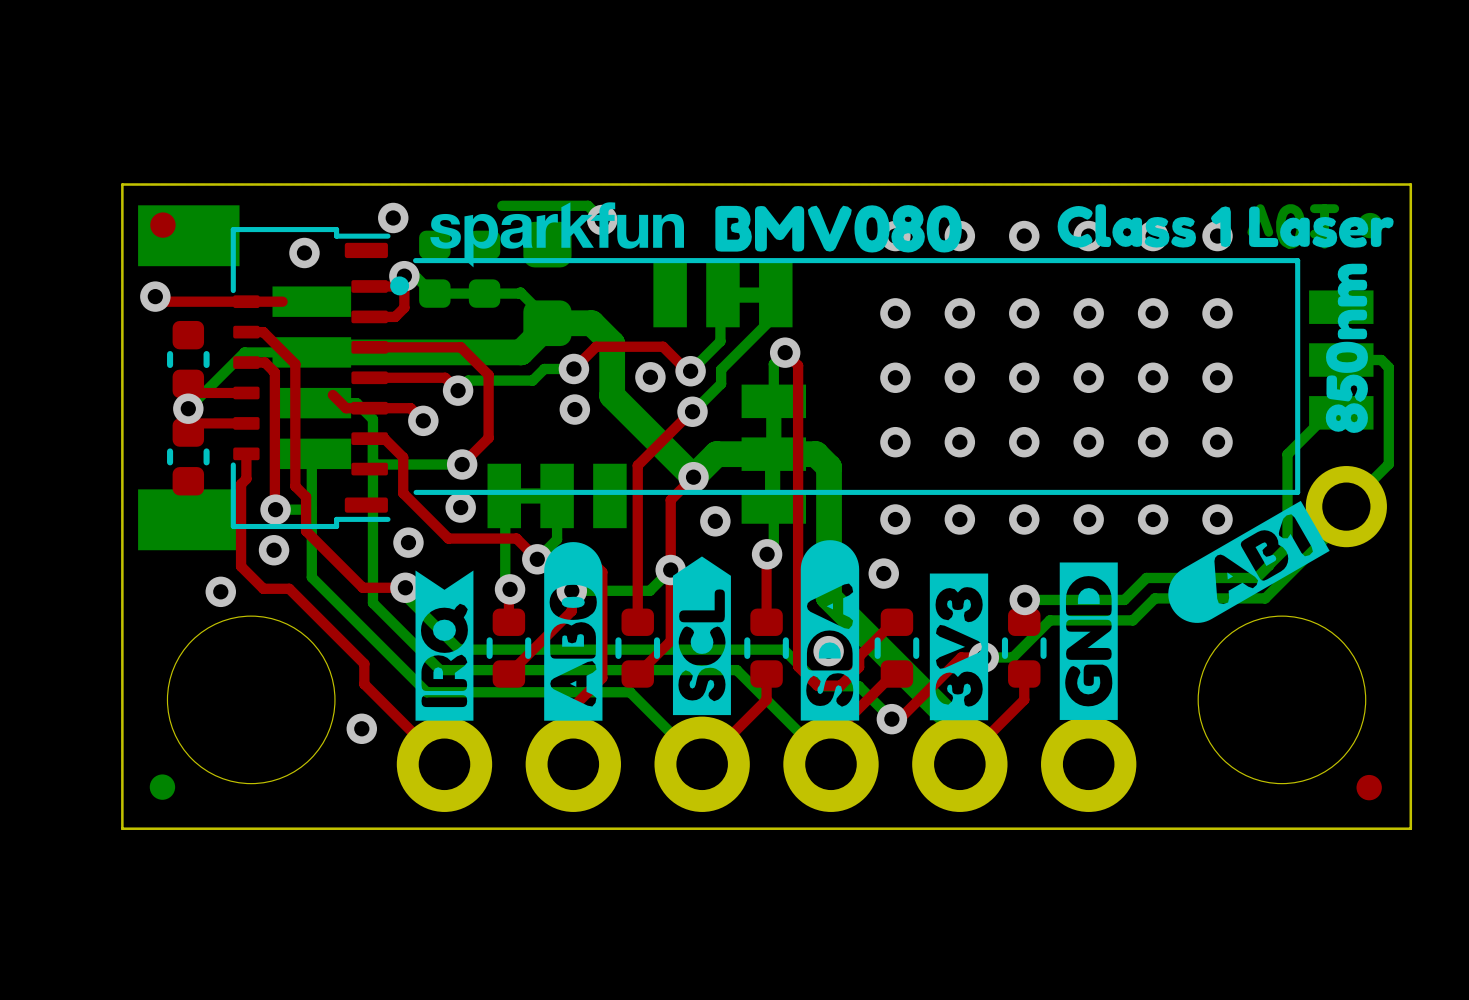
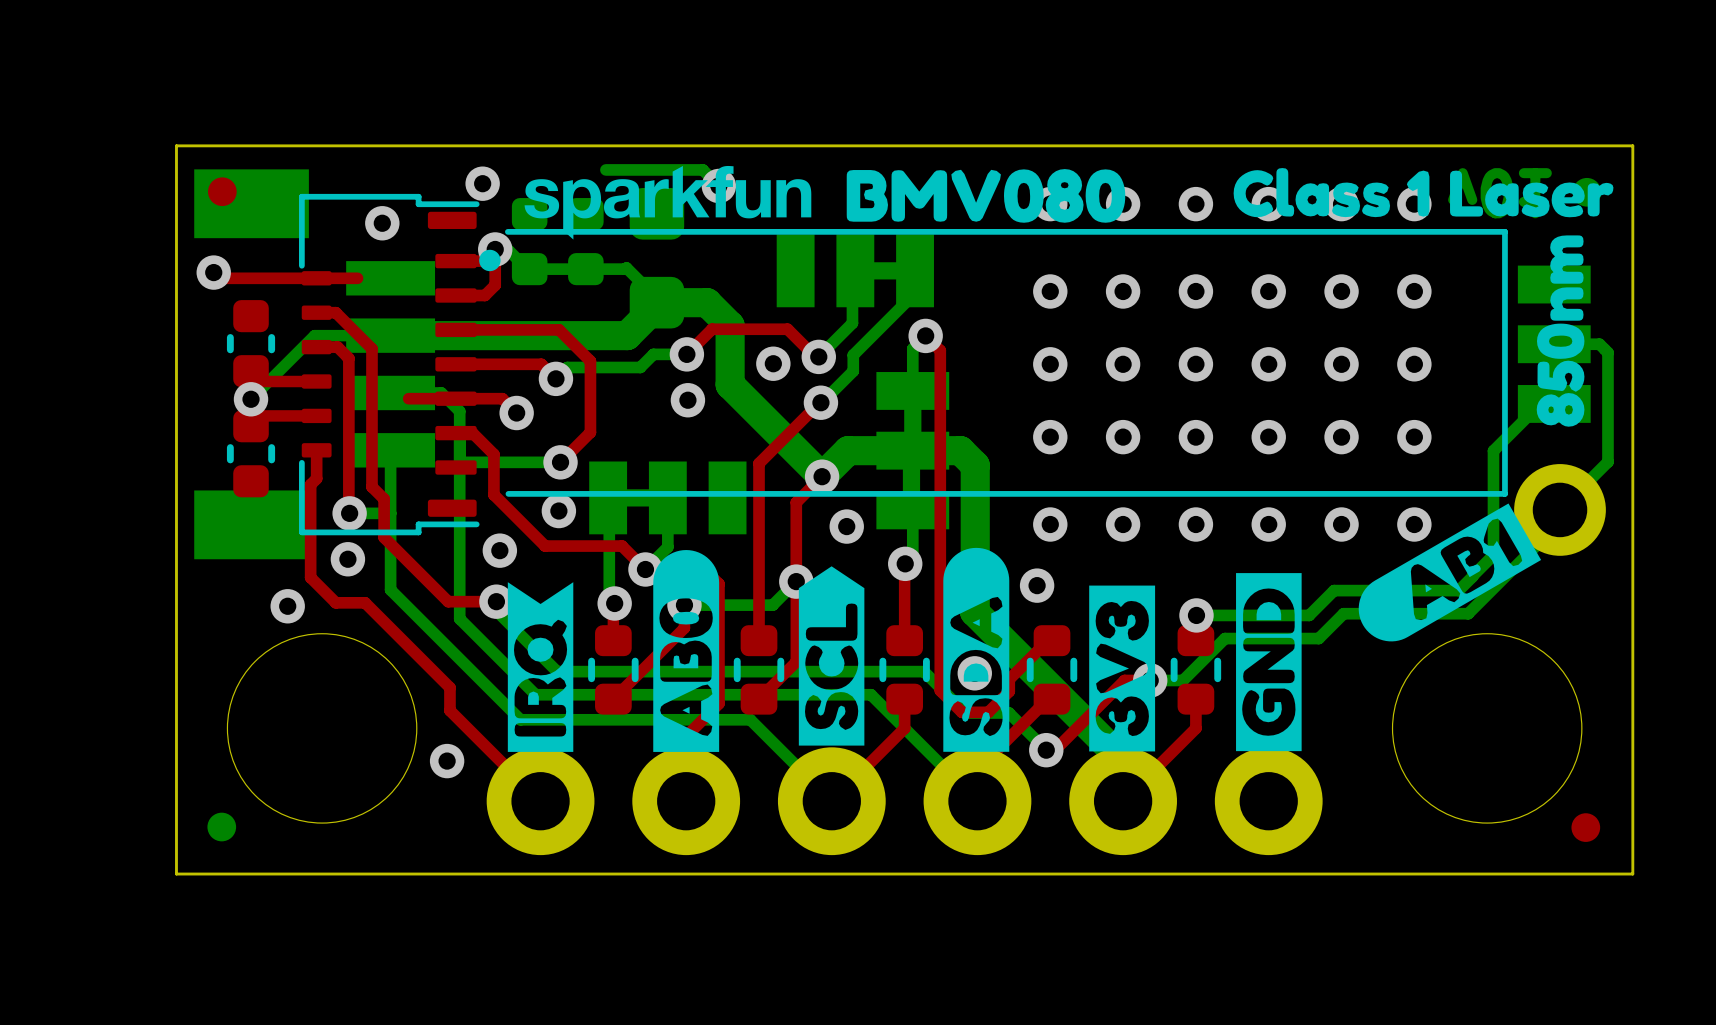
top track: (332, 395) (346, 408) -> (408, 398) (429, 398)

